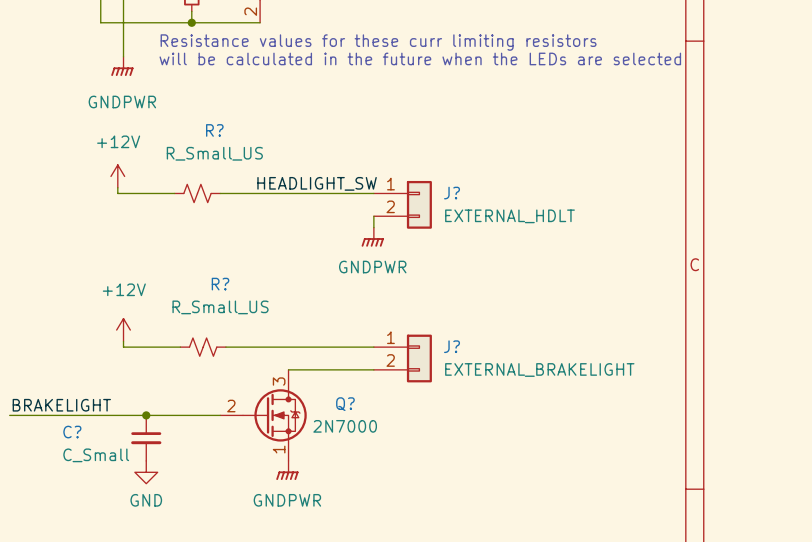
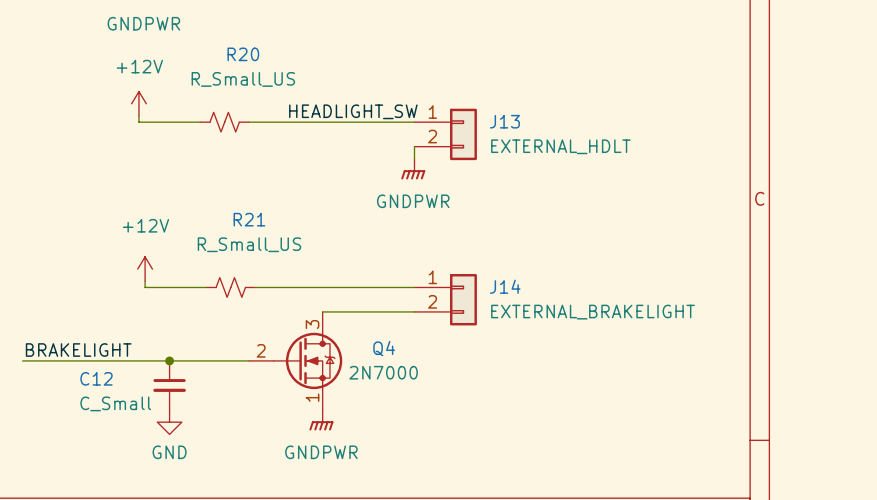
R? name: R? (214, 130) -> R20 (243, 54)
J? name: J? (452, 193) -> J13 (504, 121)
R? name: R? (220, 284) -> R21 (249, 219)
J? name: J? (452, 346) -> J14 (505, 286)
Q? name: Q? (345, 404) -> Q4 (384, 348)
C? name: C? (72, 432) -> C12 (96, 378)

